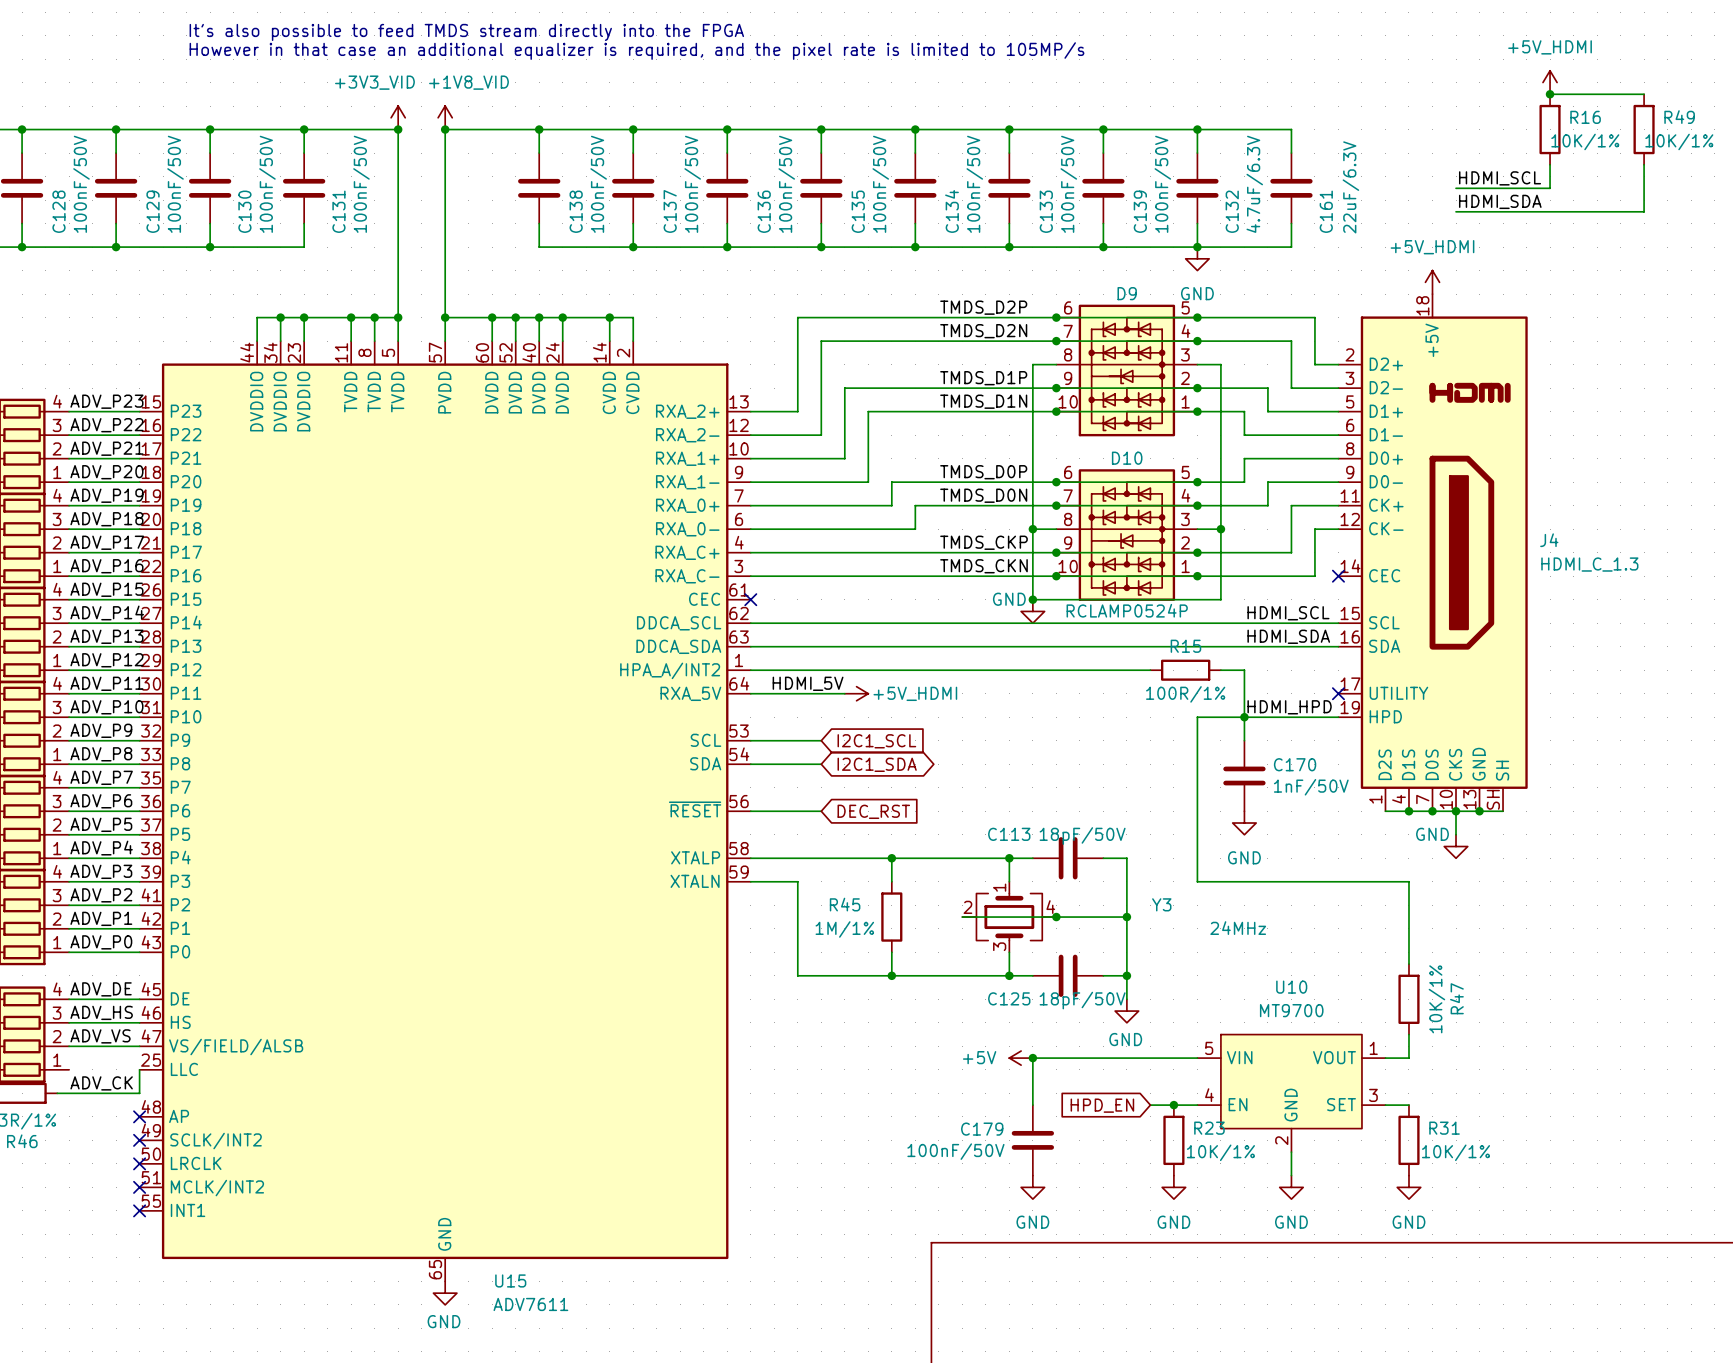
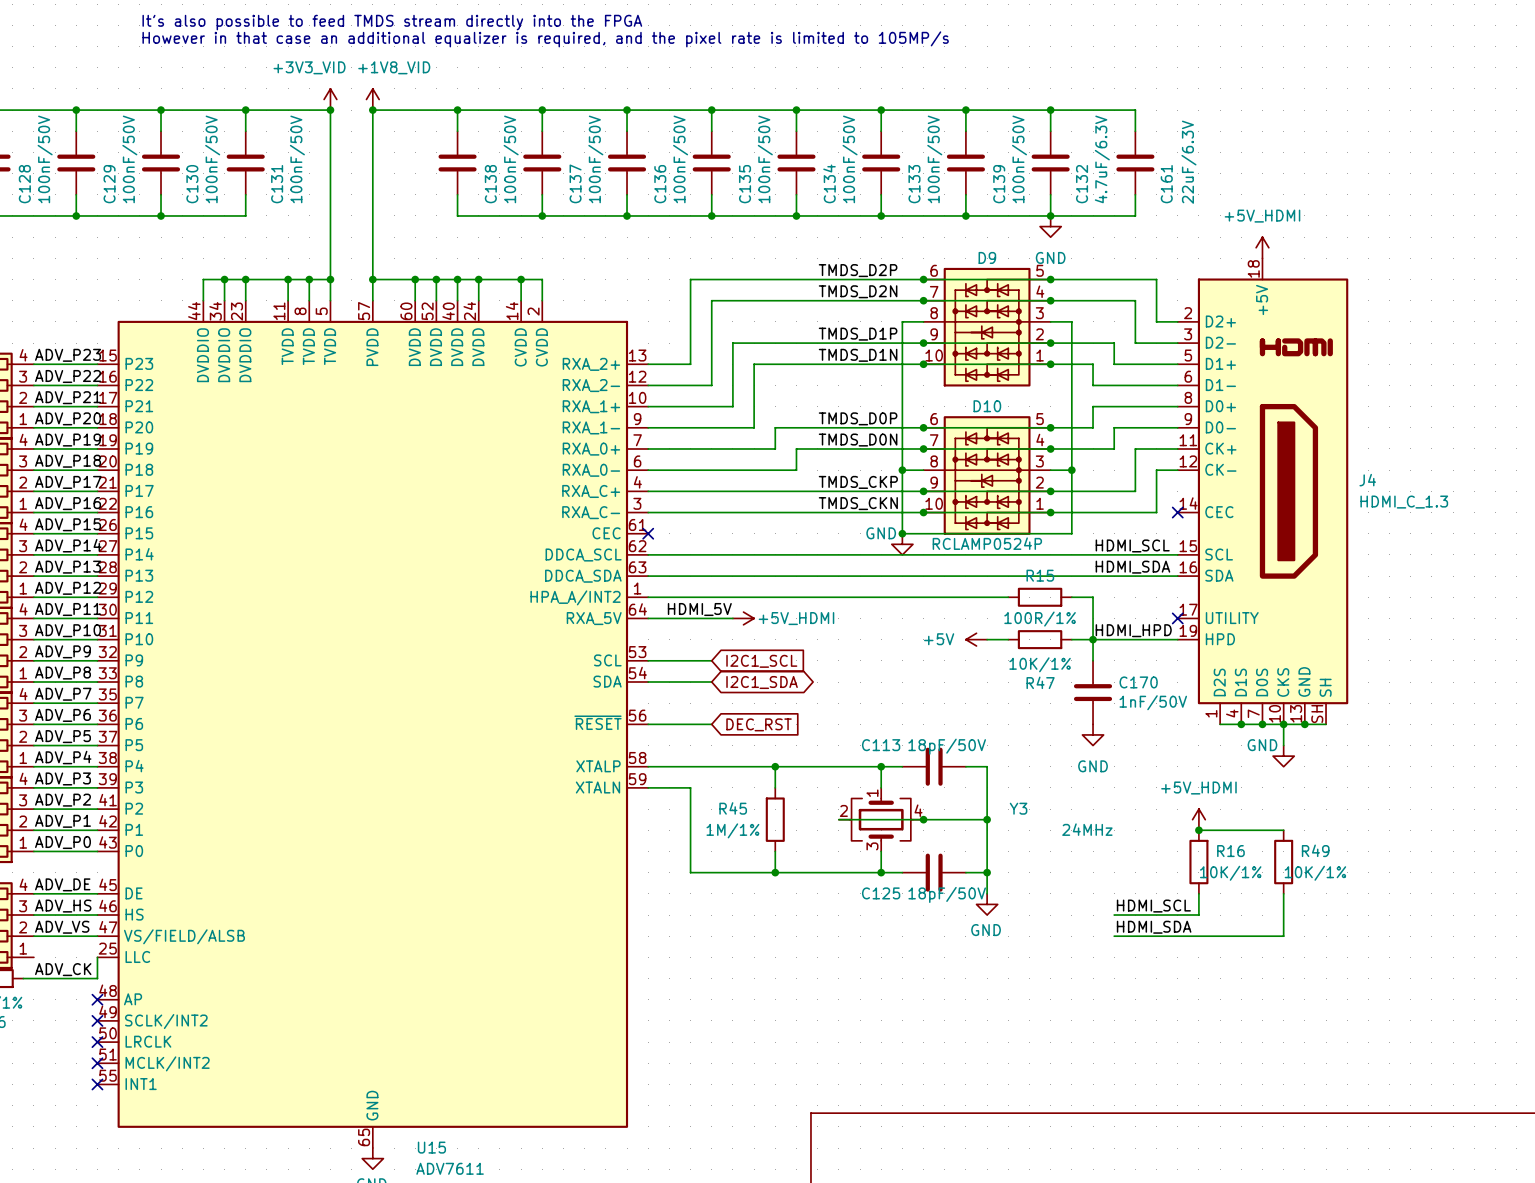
power symbol: +5V_HDMI (1550, 82) -> none
wire: (1550, 94) (1644, 94) -> none
junction: (1550, 94) -> none
R16 position: (1550, 129) -> (1198, 862)
R49 position: (1644, 129) -> (1283, 862)
wire: (1550, 164) (1550, 188) (1456, 188) -> none
wire: (1644, 164) (1644, 211) (1456, 211) -> none
label: HDMI_SCL (1500, 178) -> none
label: HDMI_SDA (1500, 201) -> none
power symbol: none -> +5V (976, 639)
wire: none -> (987, 639) (1008, 639)
wire: (1220, 717) (1197, 717) (1197, 881) (1408, 881) (1408, 964) -> none
power symbol: none -> +5V_HDMI (1198, 819)
wire: none -> (1198, 830) (1283, 830)
junction: none -> (1198, 830)
wire: none -> (1198, 893) (1198, 915) (1114, 915)
R47 rotation: 0° (1408, 999) -> 90° clockwise (1040, 639)
R47 position: (1408, 999) -> (1040, 639)
wire: none -> (1283, 893) (1283, 936) (1114, 936)
label: none -> HDMI_SCL (1153, 906)
wire: (1408, 1034) (1408, 1058) (1385, 1058) -> none
label: none -> HDMI_SDA (1154, 927)
power symbol: +5V (1021, 1058) -> none
junction: (1032, 1058) -> none
wire: (1197, 1058) (1032, 1058) (1032, 1105) -> none
U10: MT9700 (1291, 1093) -> none
global label: HPD_EN (1102, 1105) -> none
wire: (1150, 1105) (1197, 1105) -> none
junction: (1173, 1105) -> none
wire: (1385, 1105) (1408, 1105) -> none
C179: 100nF/50V (1032, 1140) -> none
R23: 10K/1% (1173, 1140) -> none
R31: 10K/1% (1408, 1140) -> none
wire: (1291, 1152) (1291, 1175) -> none
power symbol: GND (1032, 1187) -> none
power symbol: GND (1173, 1187) -> none
power symbol: GND (1291, 1187) -> none
power symbol: GND (1408, 1187) -> none

